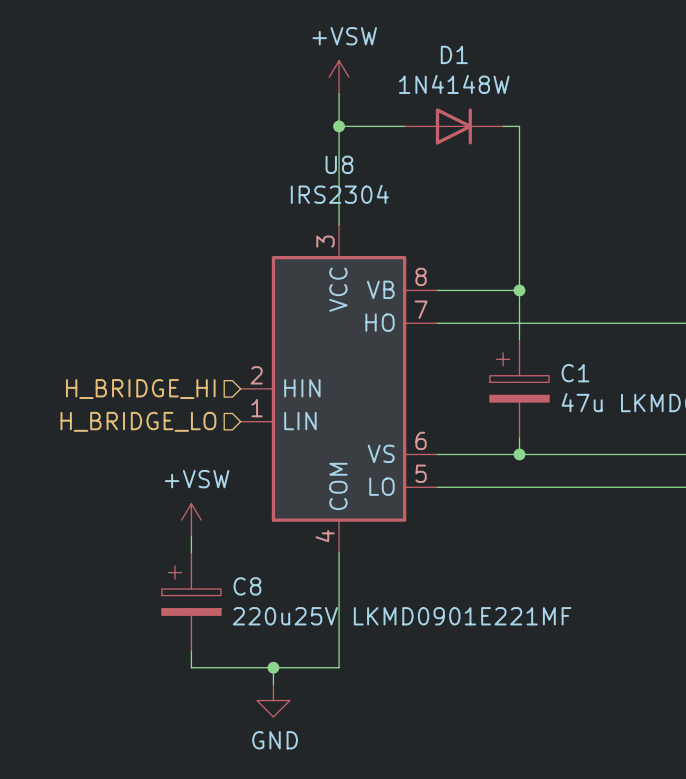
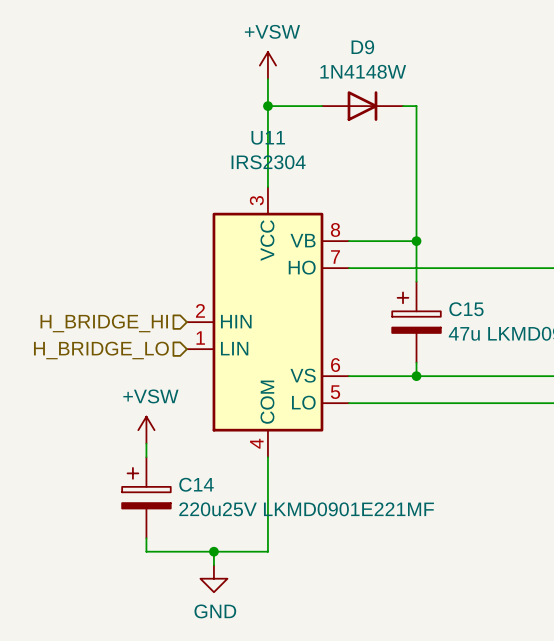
D1 name: D1 (454, 54) -> D9 (362, 47)
U8 name: U8 (339, 164) -> U11 (268, 137)
C1 name: C1 (575, 373) -> C15 (466, 309)
C8 name: C8 (247, 586) -> C14 (196, 484)

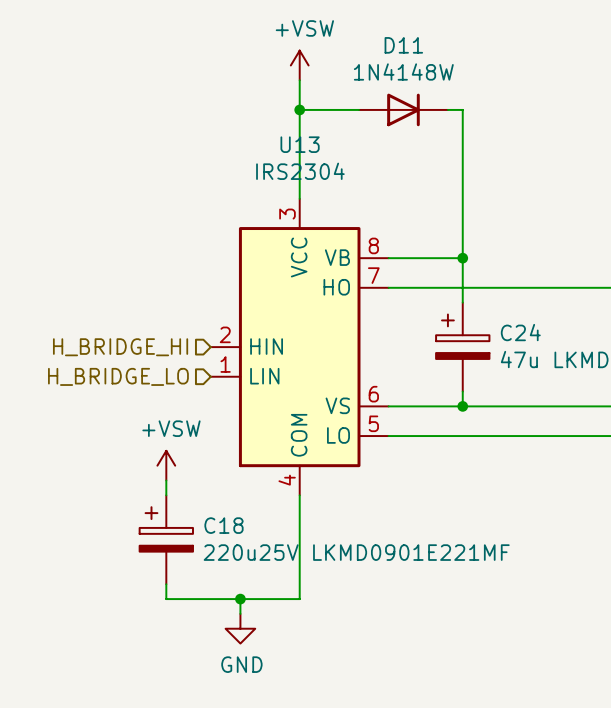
D9 name: D9 (362, 47) -> D11 (403, 45)
U11 name: U11 (268, 137) -> U13 (300, 144)
C15 name: C15 (466, 309) -> C24 (520, 332)
C14 name: C14 (196, 484) -> C18 (223, 525)

